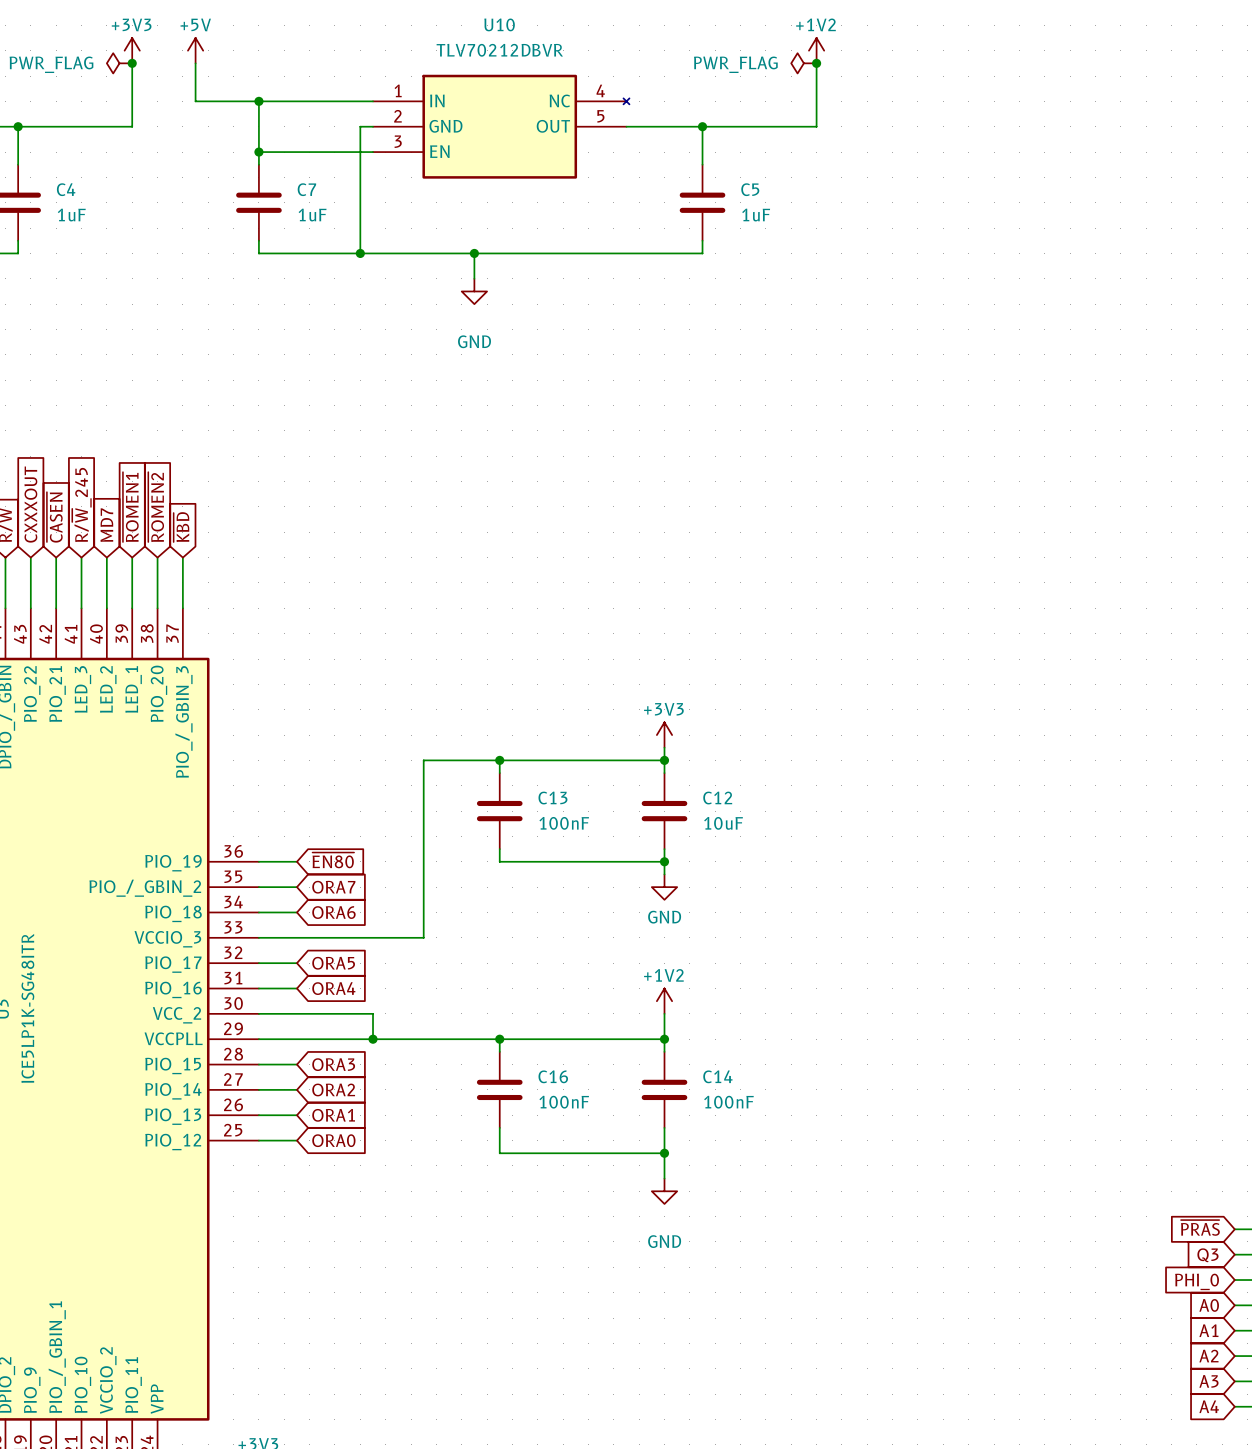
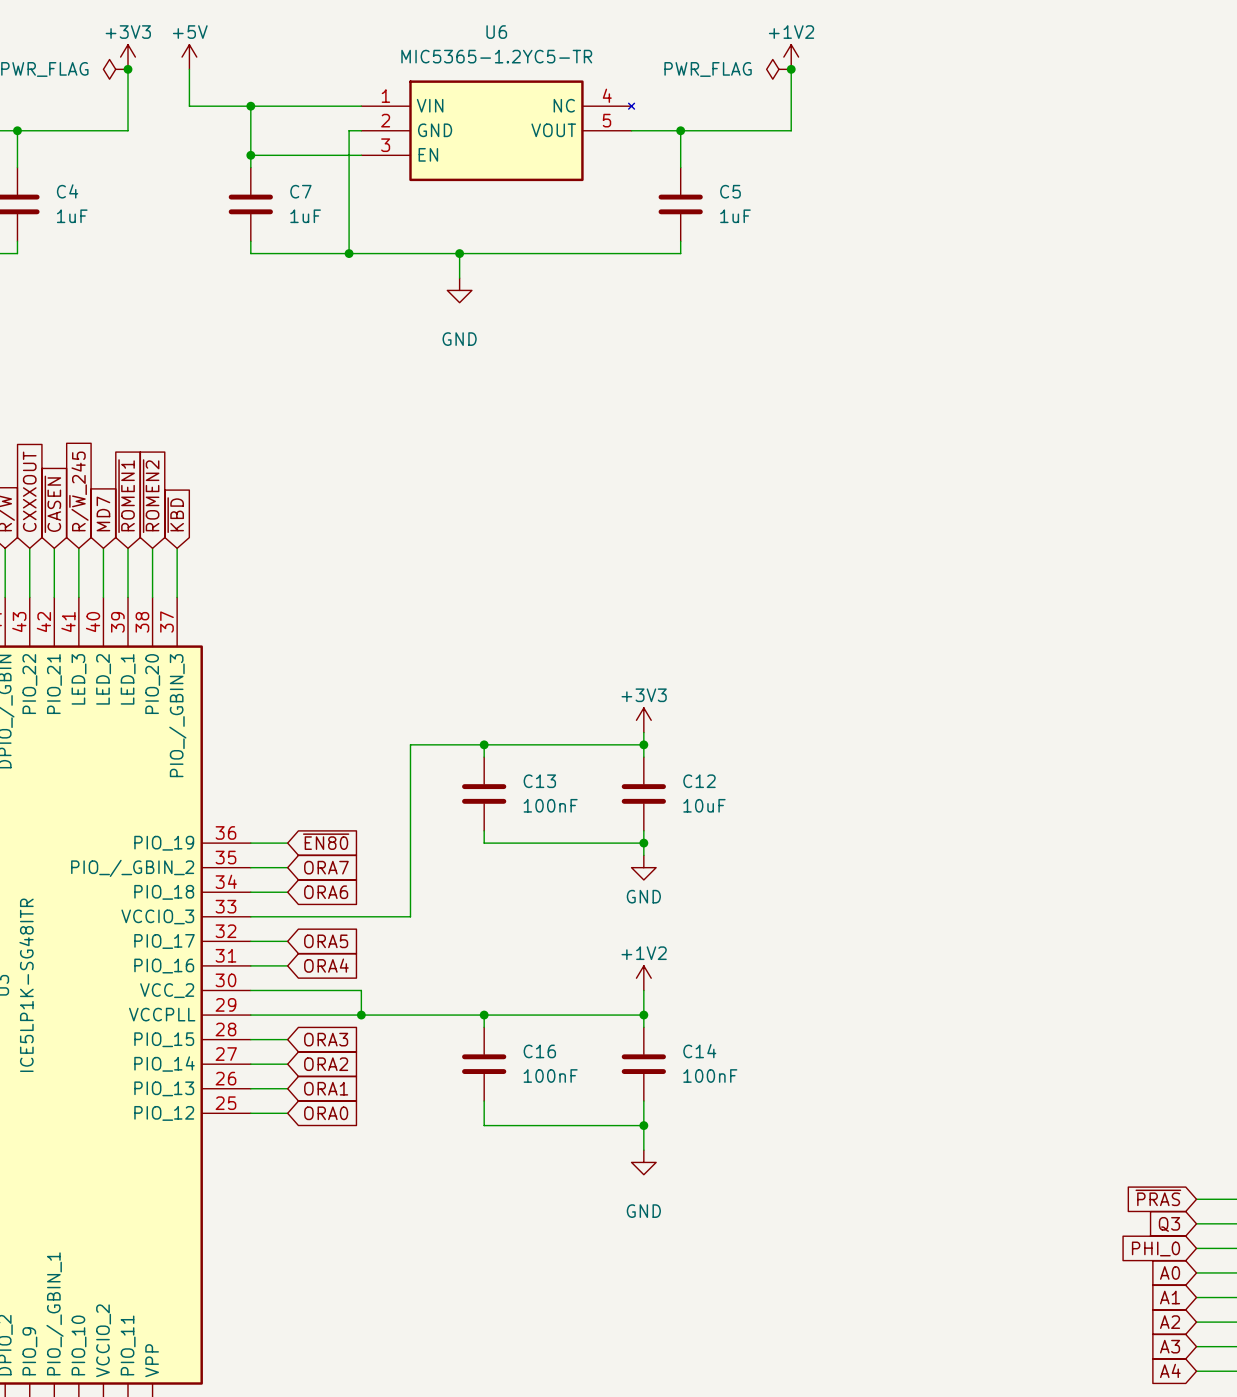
U10: TLV70212DBVR (501, 126) -> none
U6: none -> MIC5365-1.2YC5-TR (497, 130)

